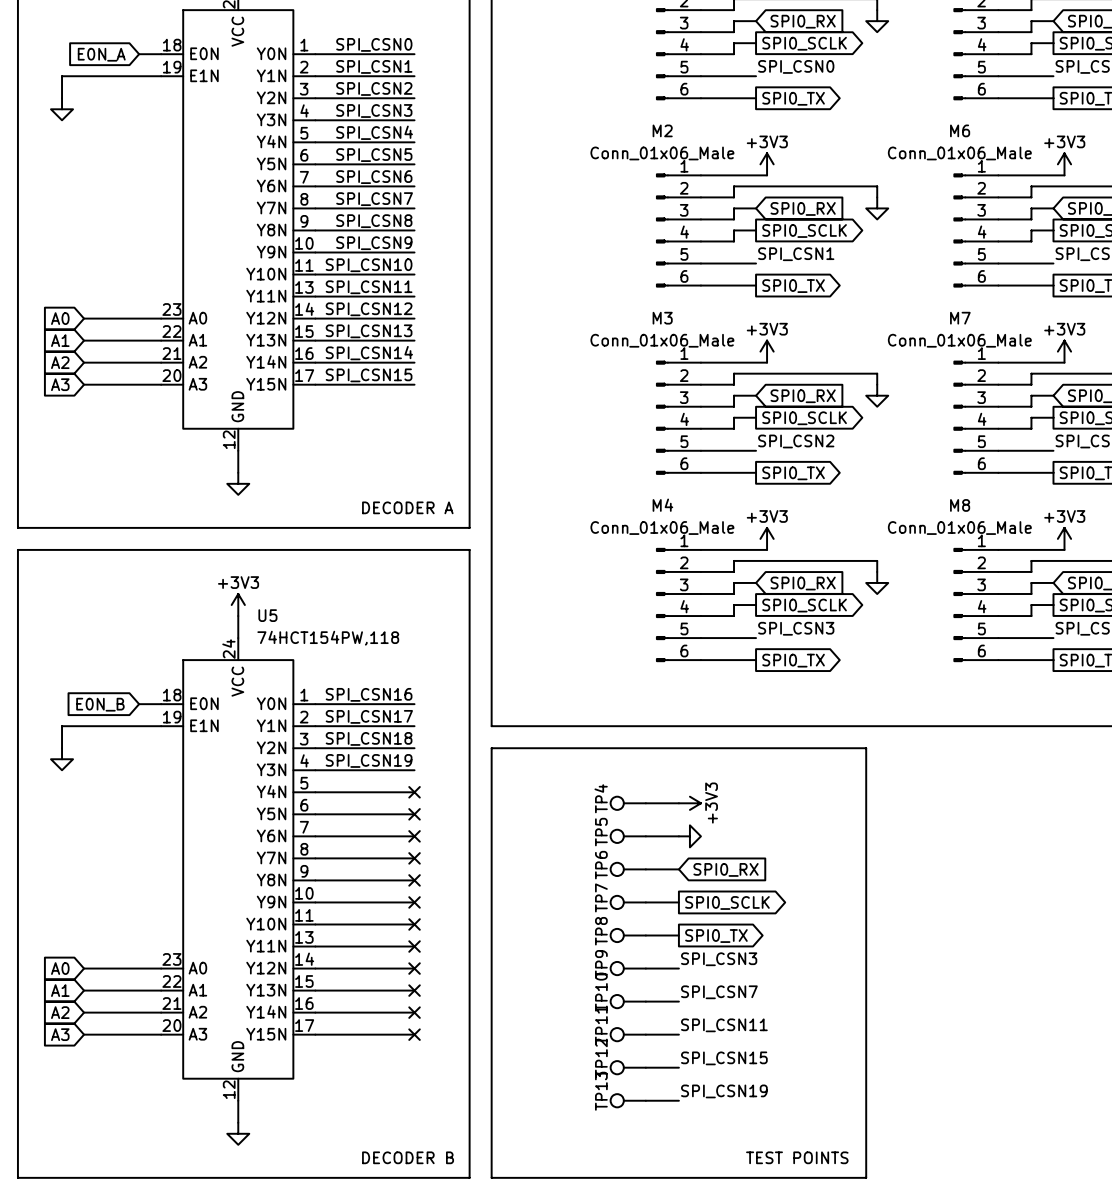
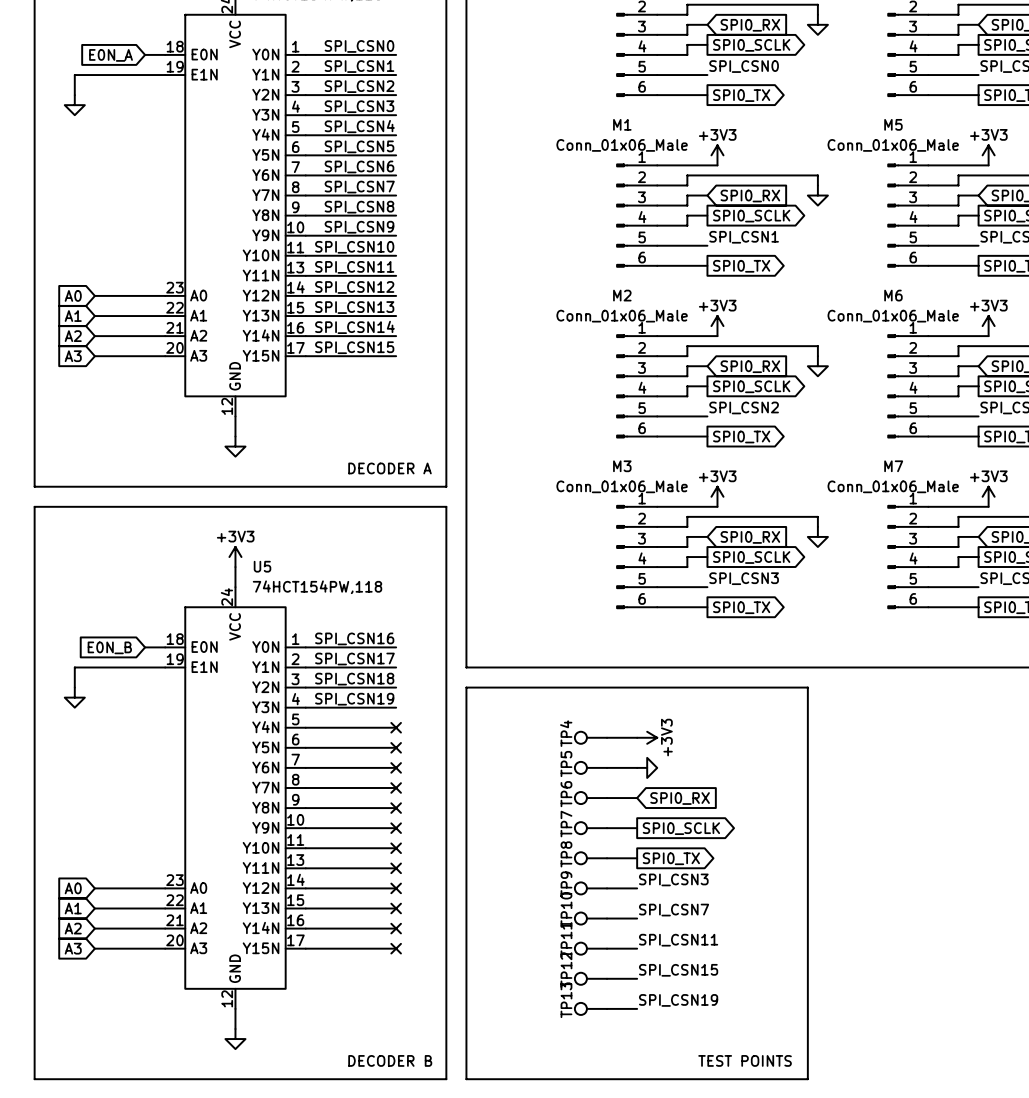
M2 name: M2 (662, 130) -> M1 (622, 124)
M6 name: M6 (960, 130) -> M5 (893, 124)
M3 name: M3 (662, 318) -> M2 (622, 295)
M7 name: M7 (960, 318) -> M6 (893, 295)
M4 name: M4 (662, 505) -> M3 (622, 466)
M8 name: M8 (960, 505) -> M7 (893, 466)

